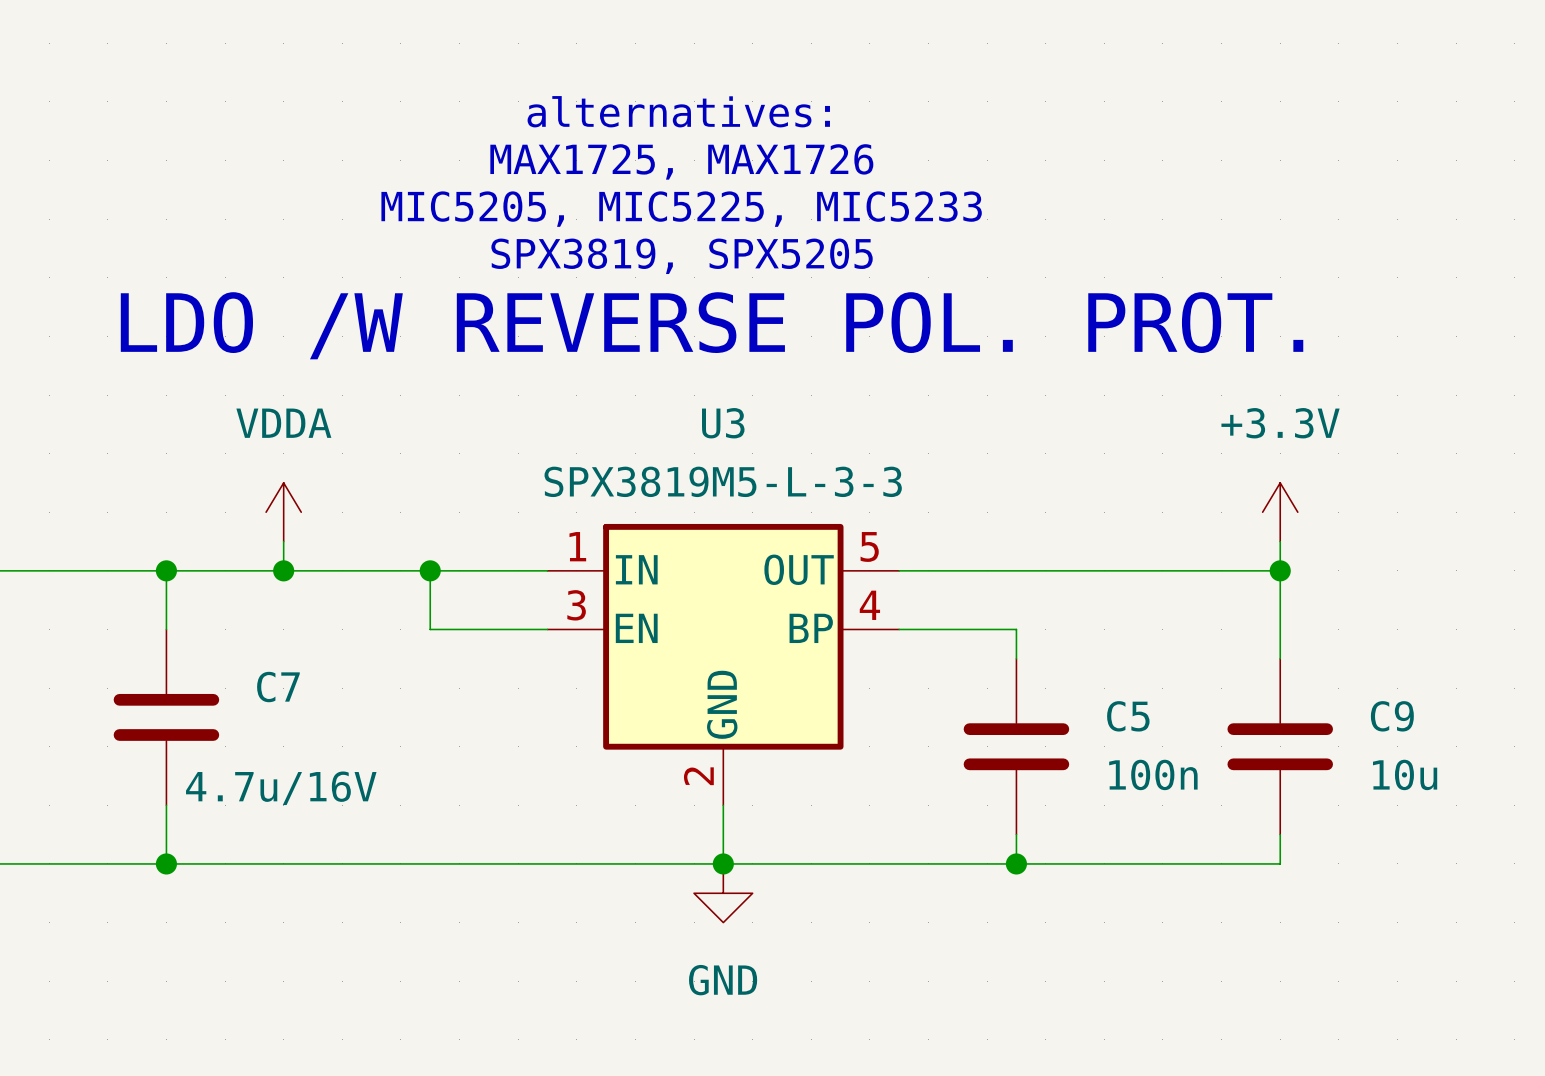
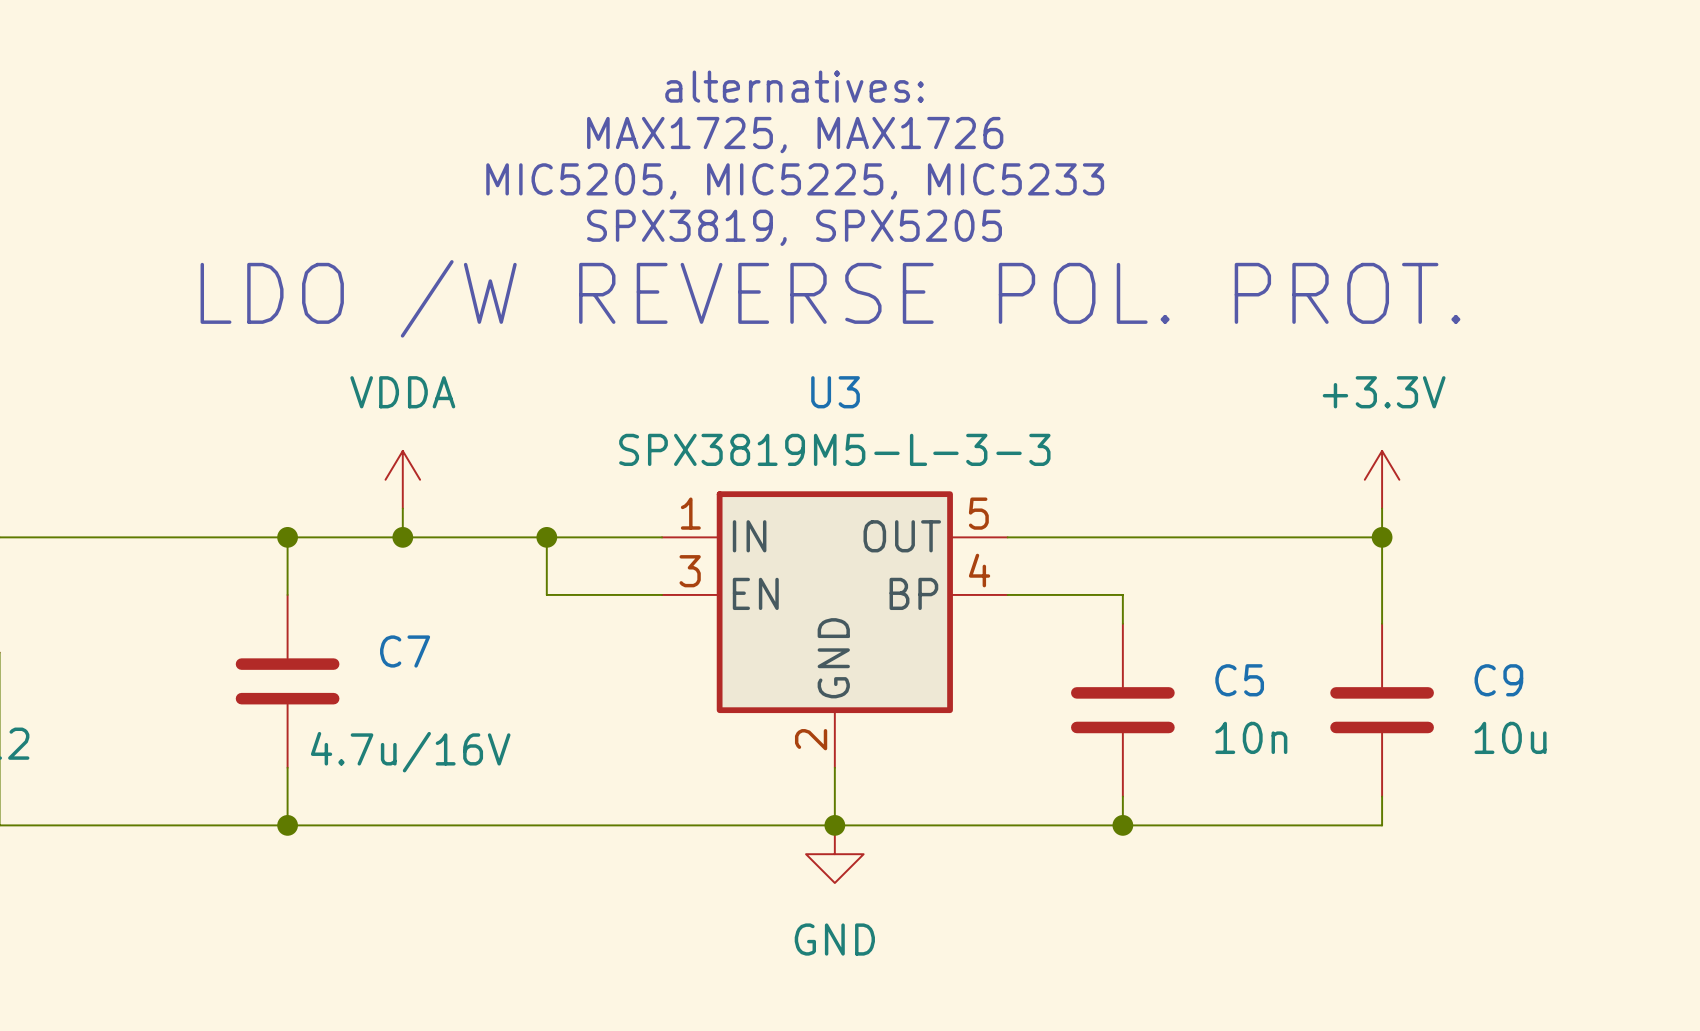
C5 value: 100n (1153, 774) -> 10n (1251, 737)

